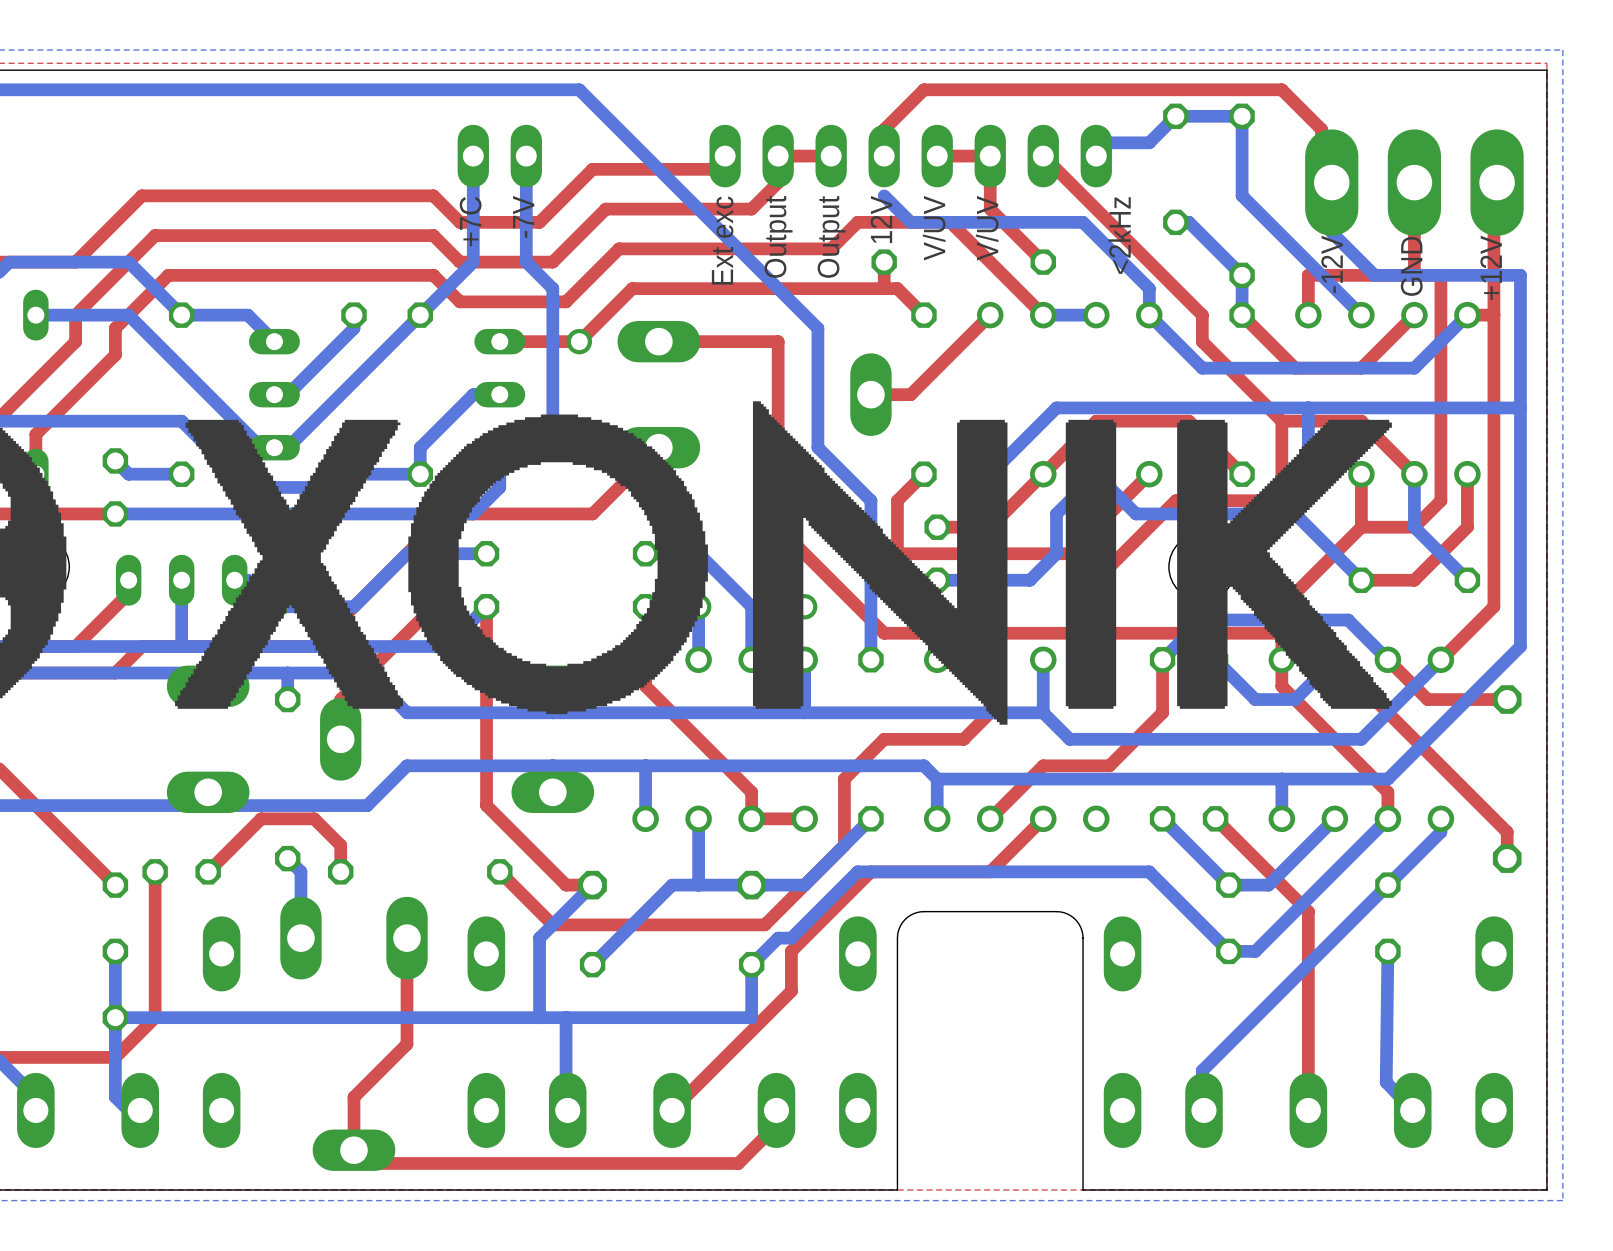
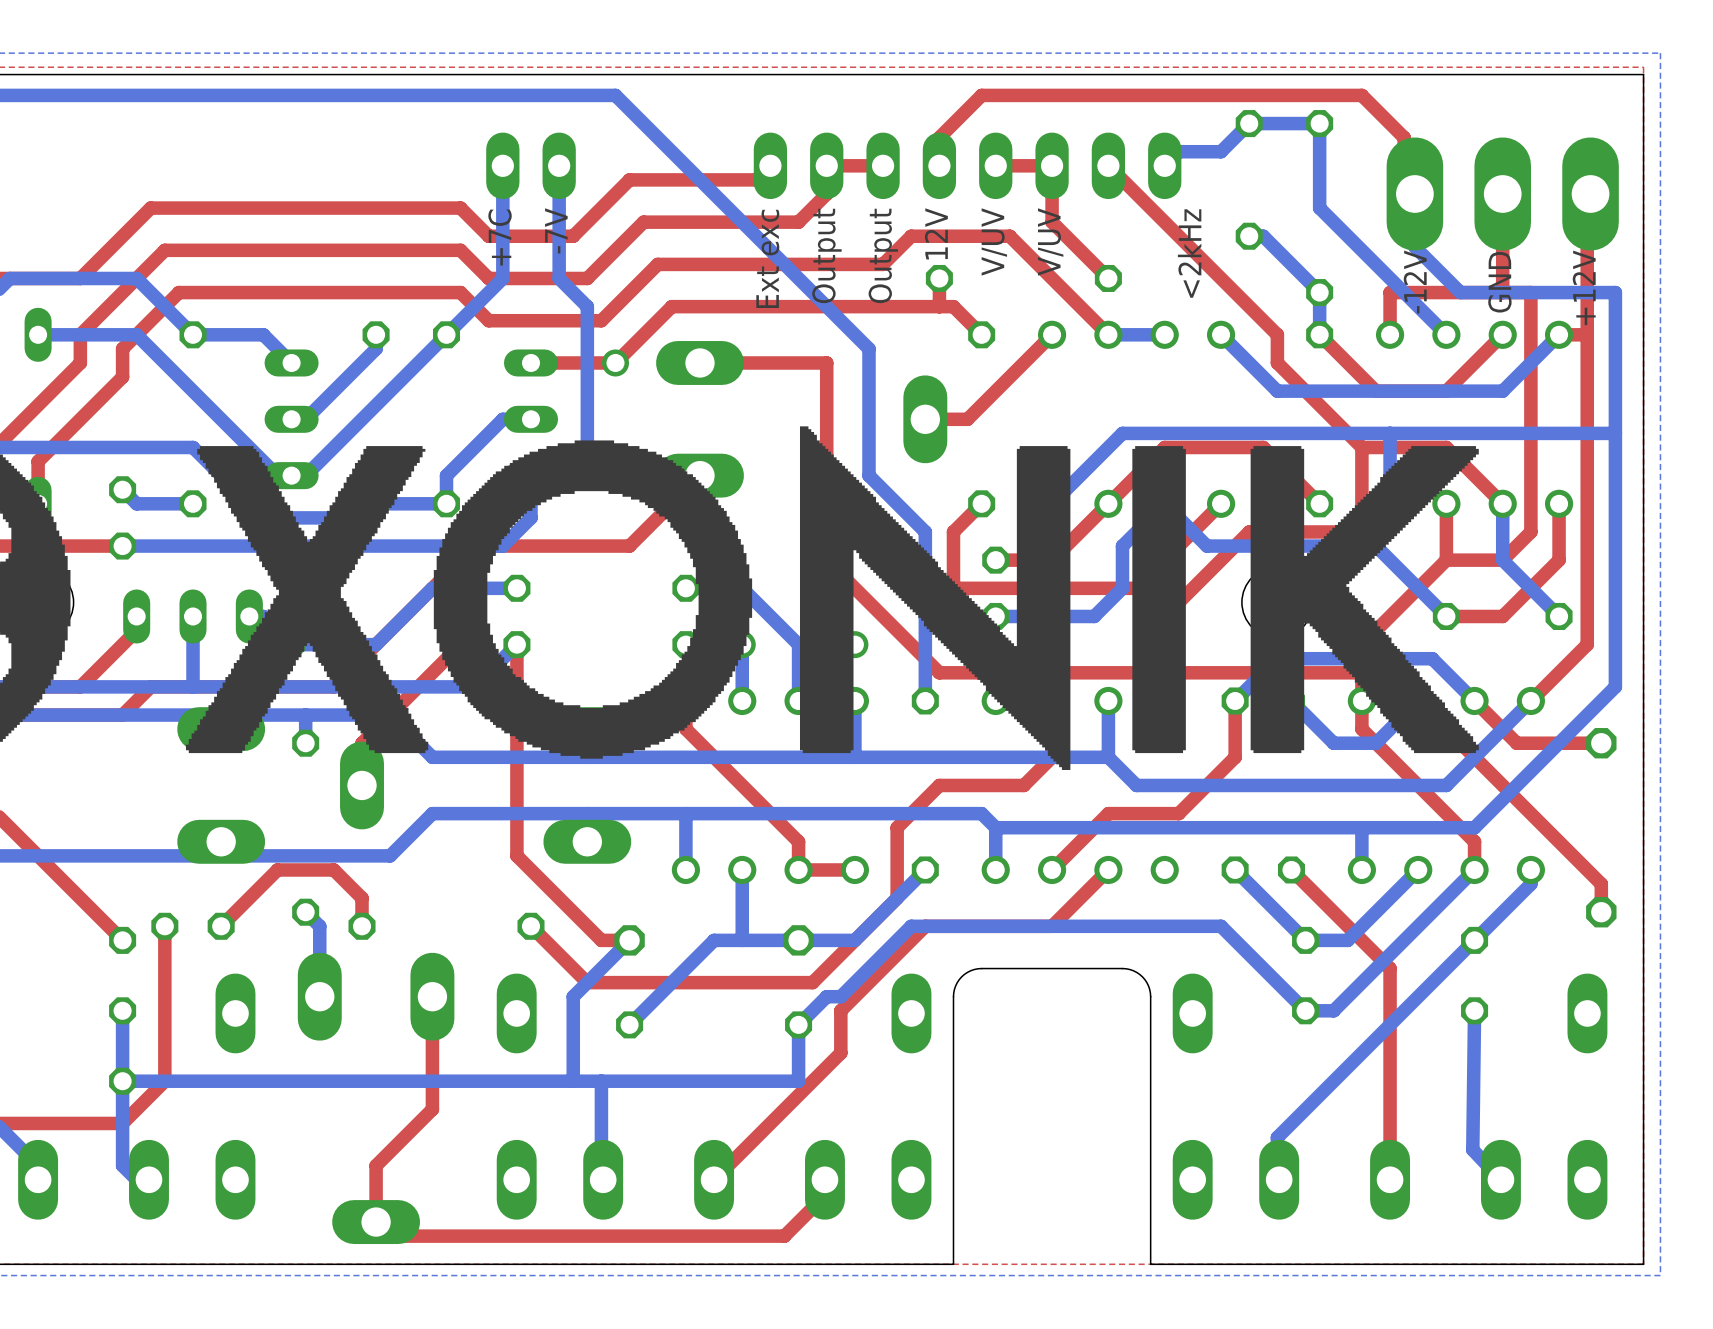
bottom track: (884, 195) (910, 222) (1083, 222) (1149, 288) (1149, 315) -> none

